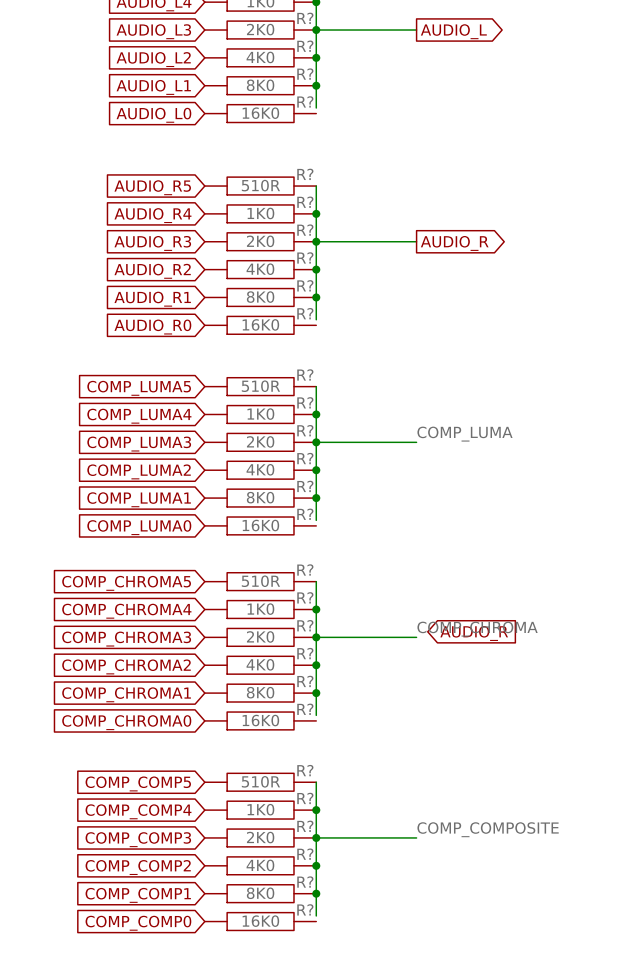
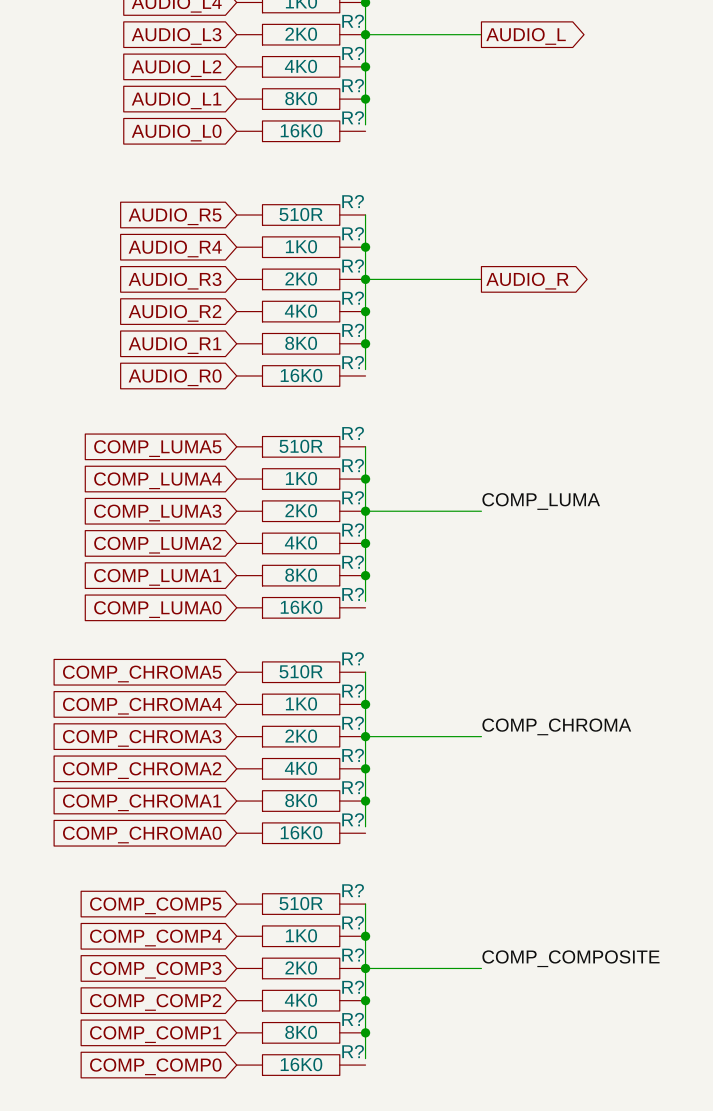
global label: AUDIO_R (474, 633) -> none

